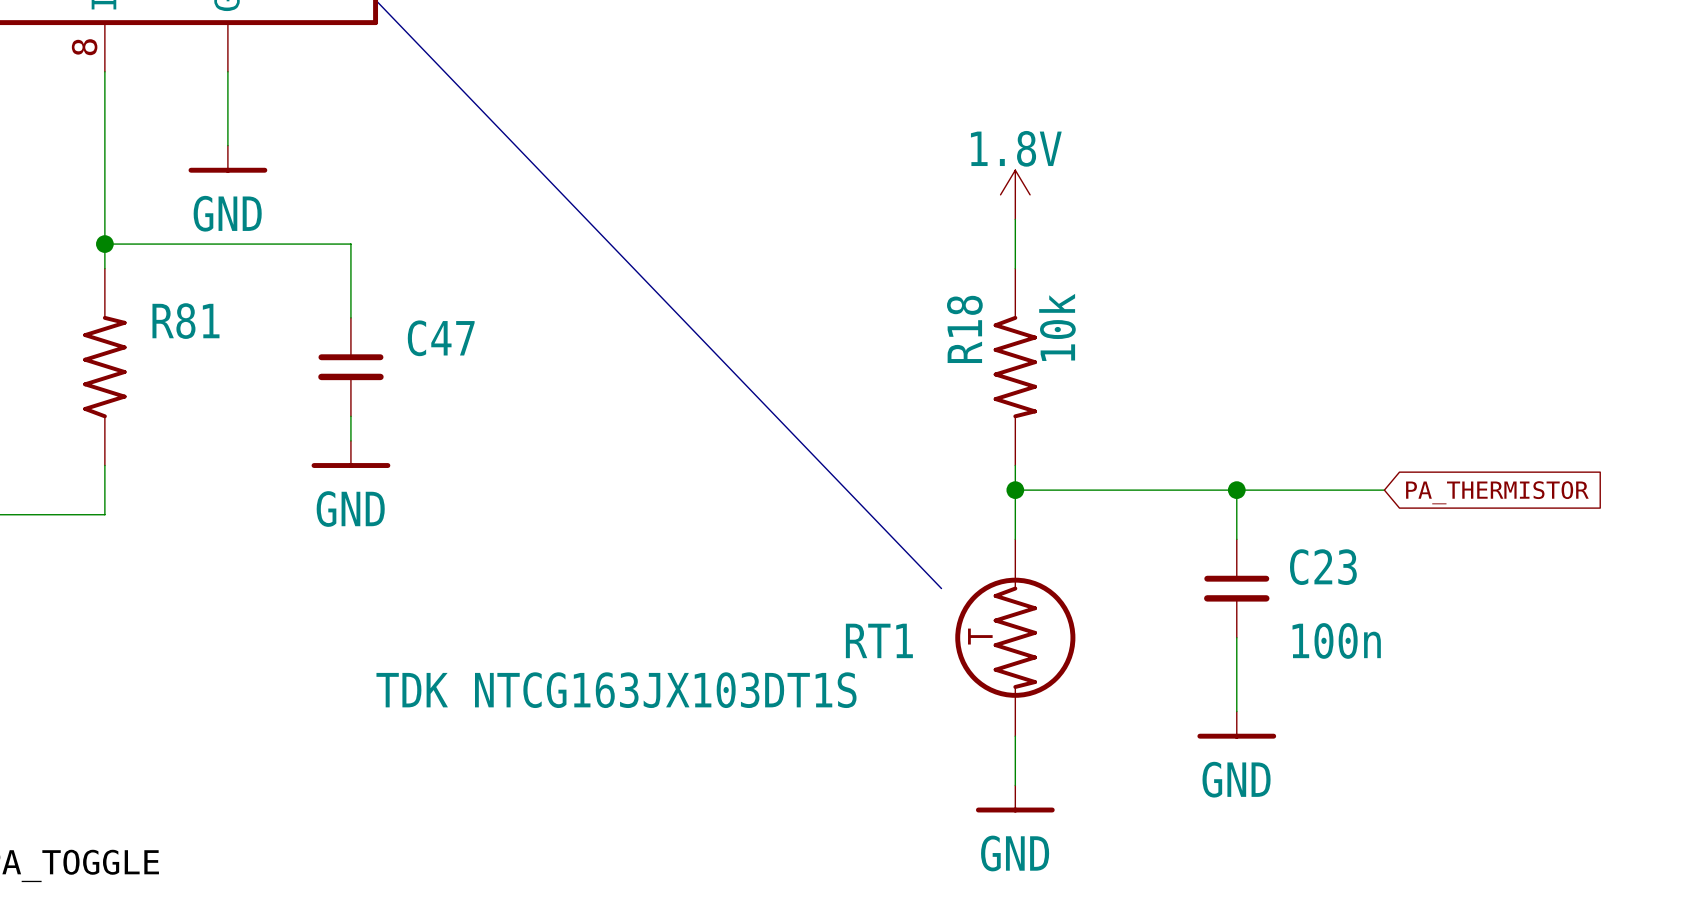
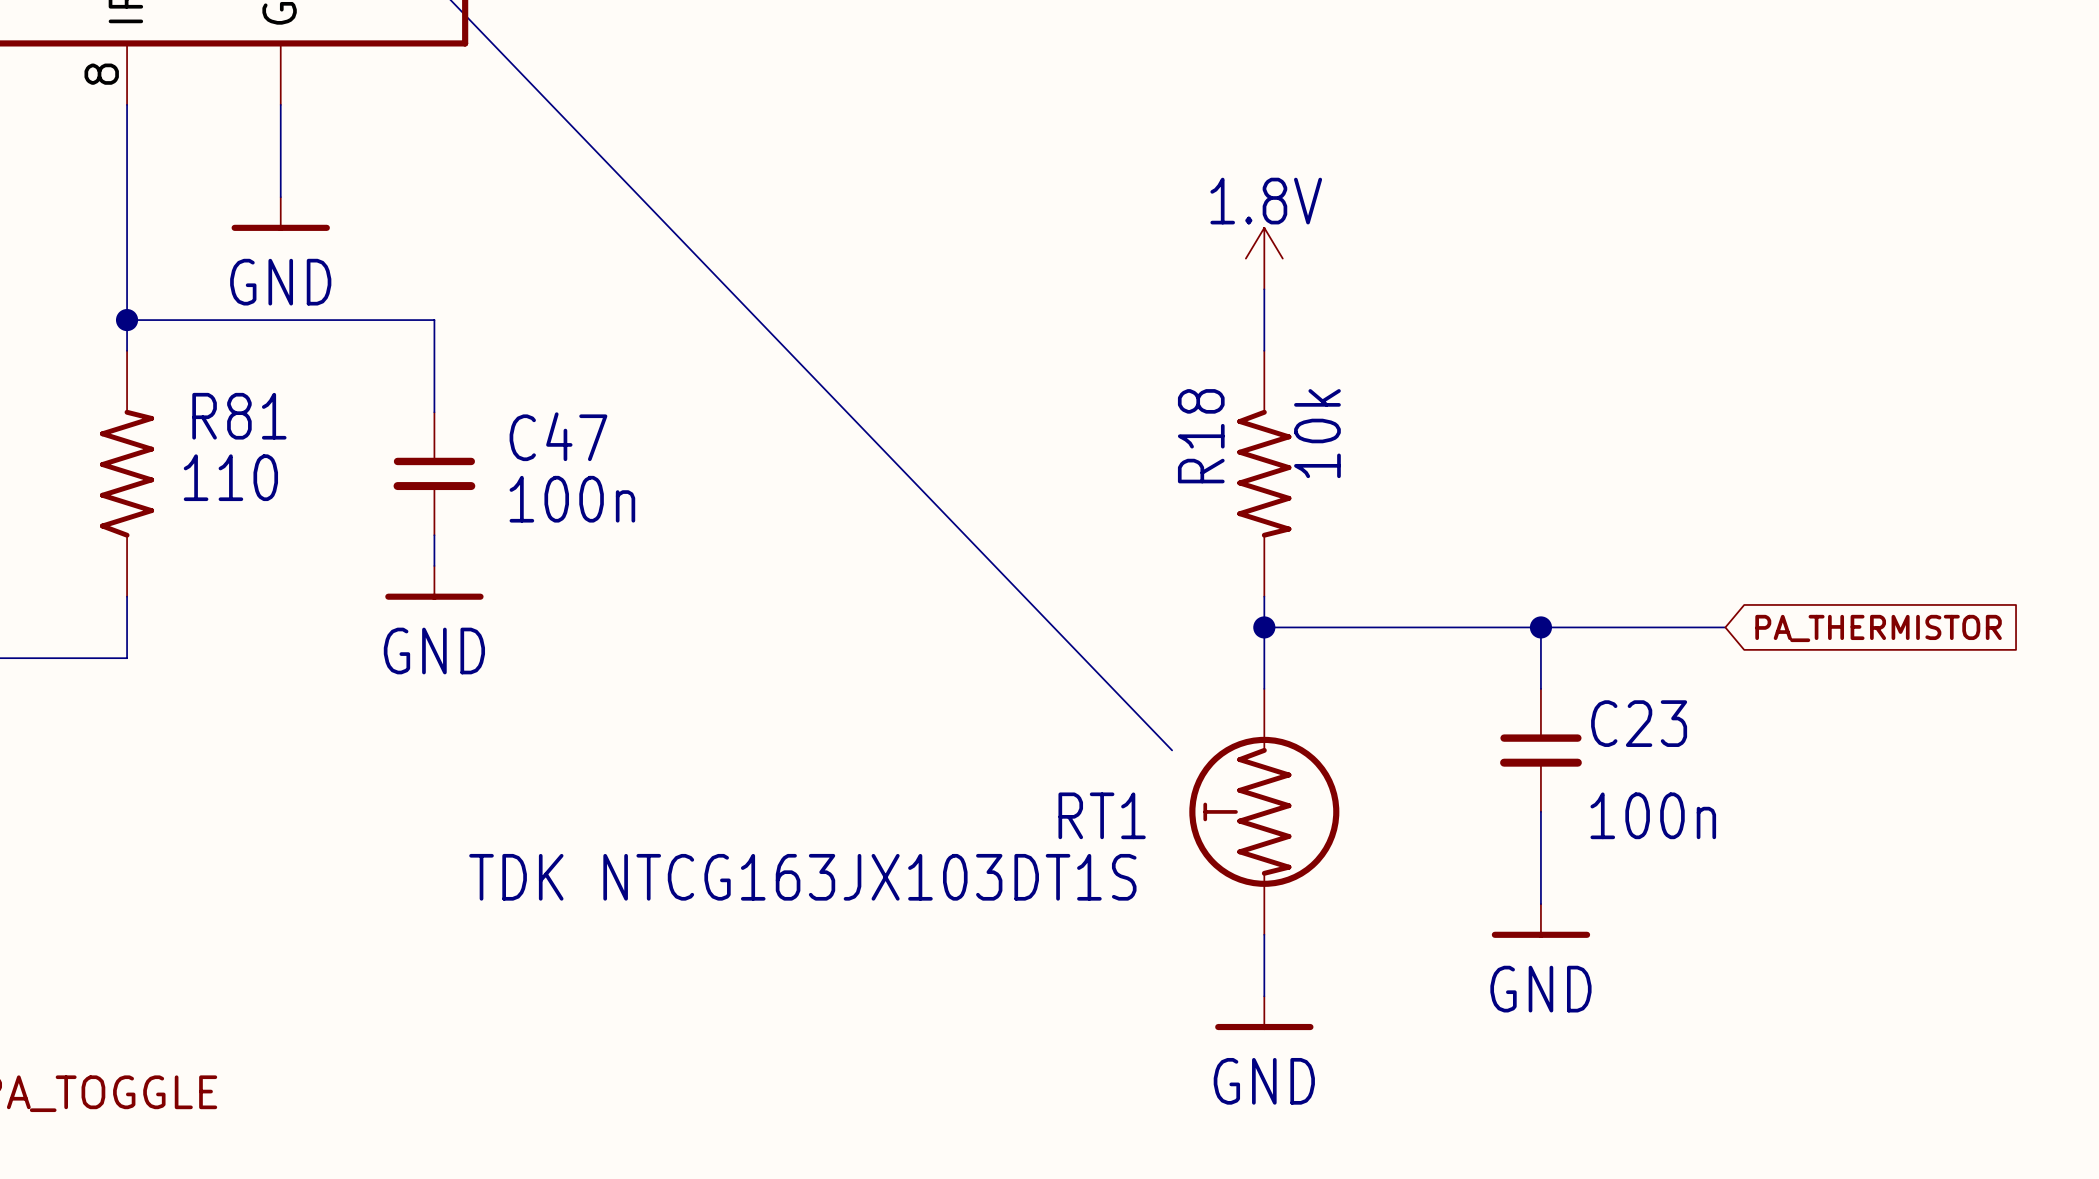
R81 value: none -> 110 (230, 477)
C47 value: none -> 100n (572, 499)

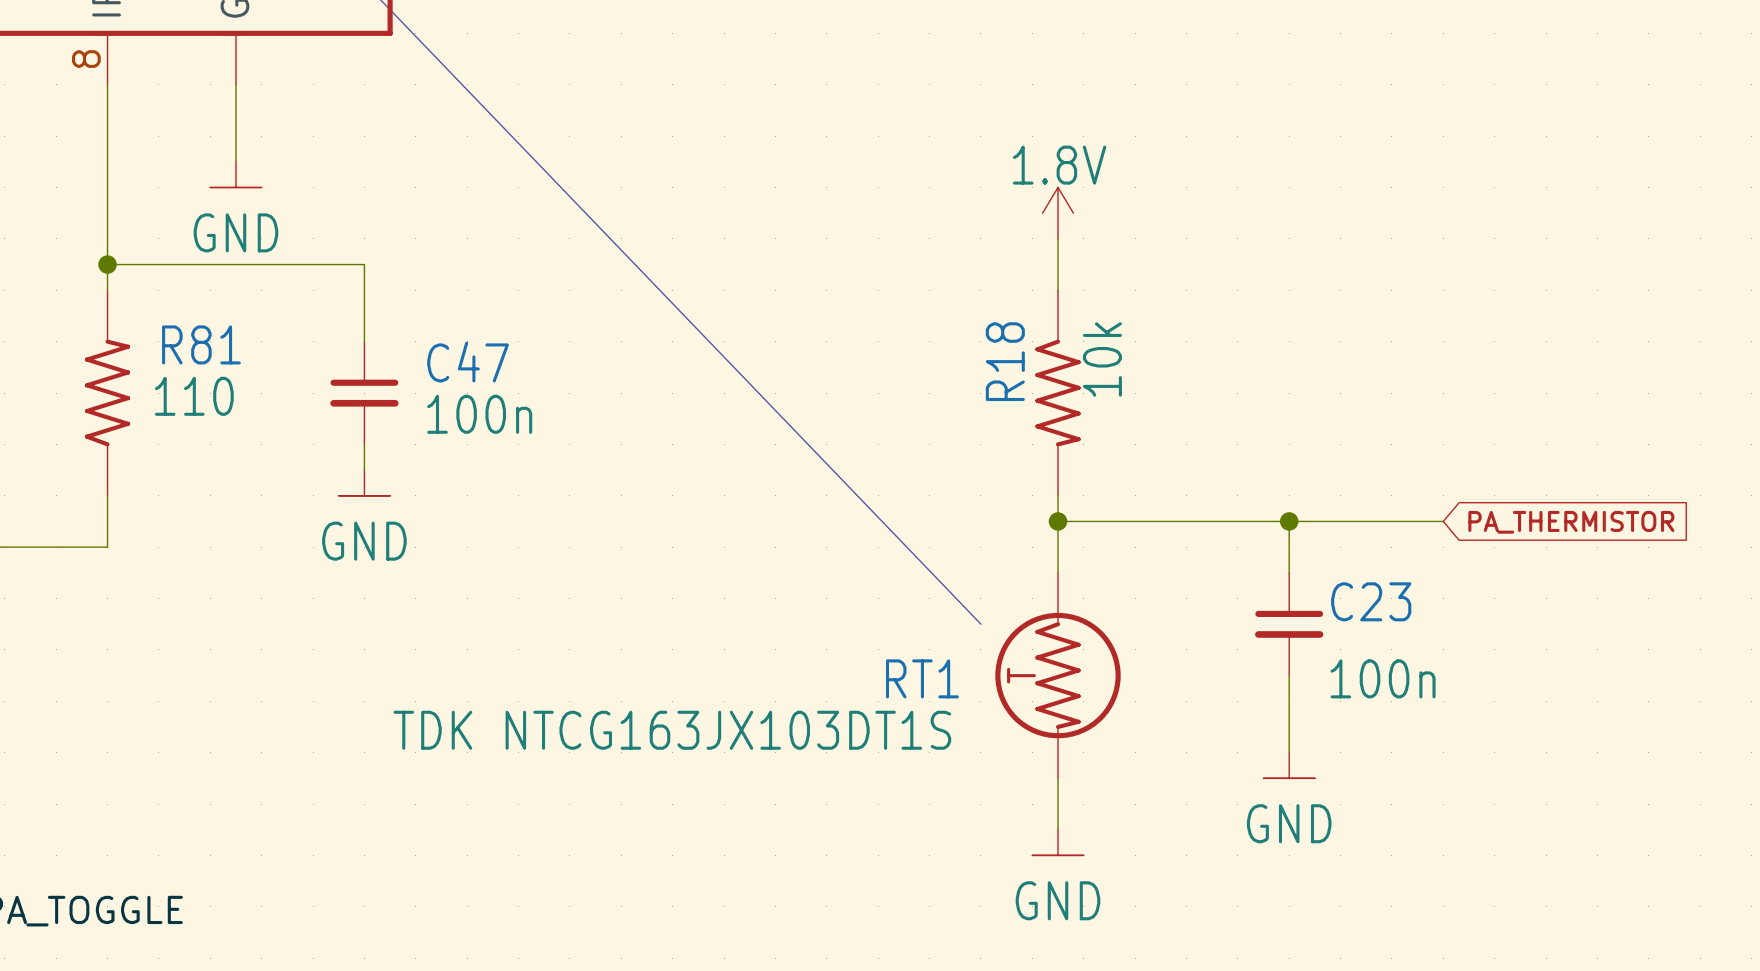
power symbol shape: [231, 197, 330, 231] -> [210, 161, 262, 188]
power symbol shape: [385, 565, 484, 600] -> [338, 470, 391, 496]
power symbol shape: [1491, 904, 1591, 938] -> [1263, 752, 1315, 779]
power symbol shape: [1215, 996, 1314, 1031] -> [1032, 829, 1084, 856]

